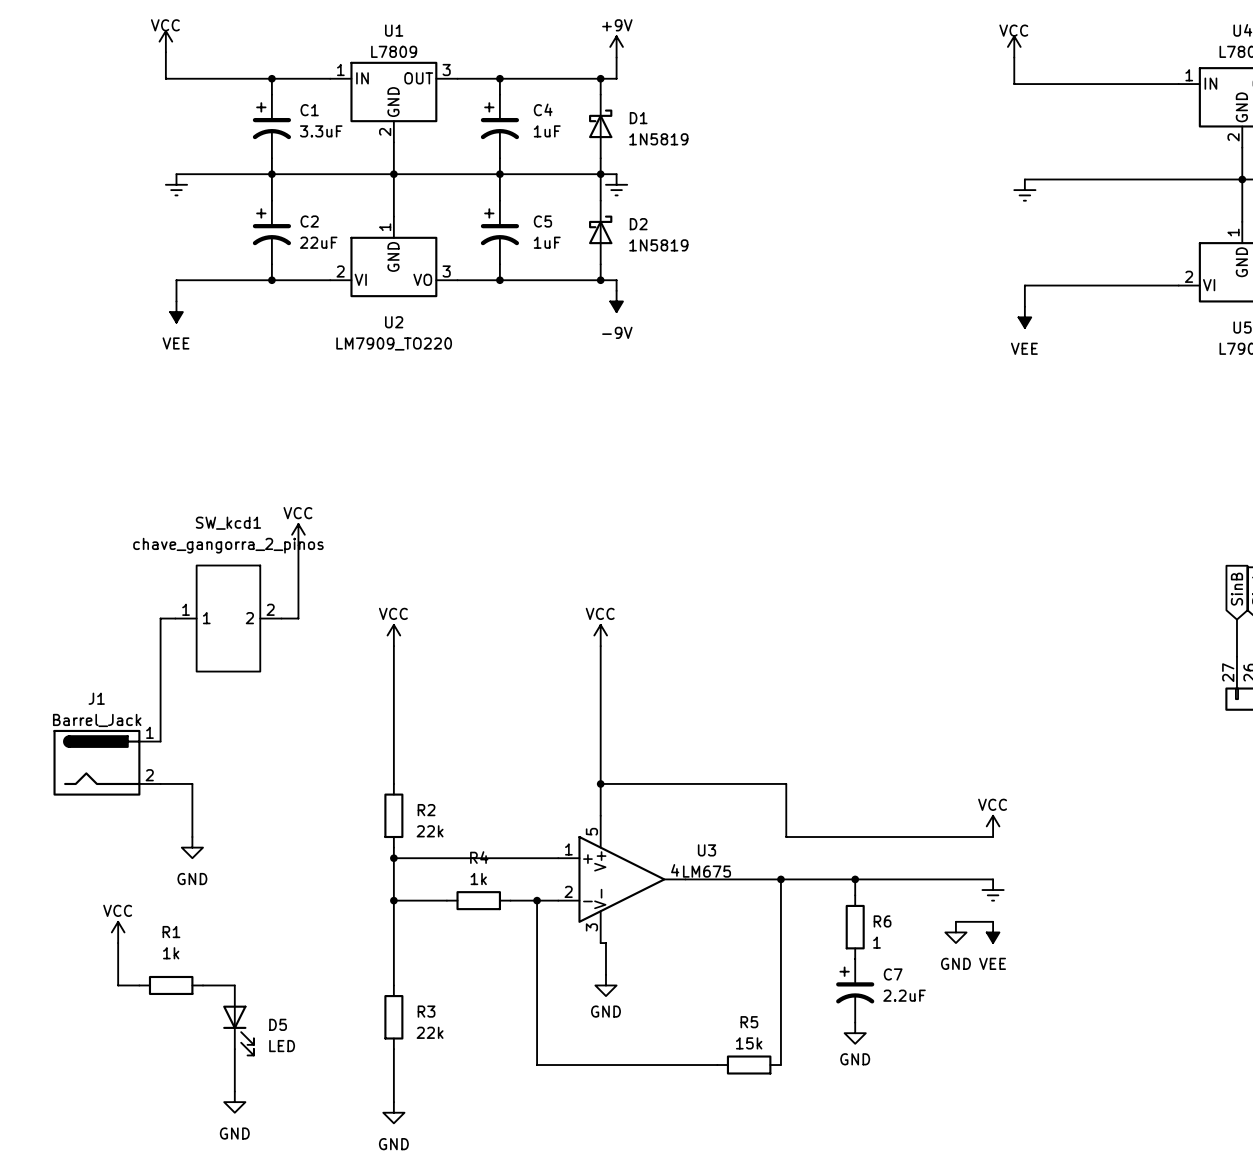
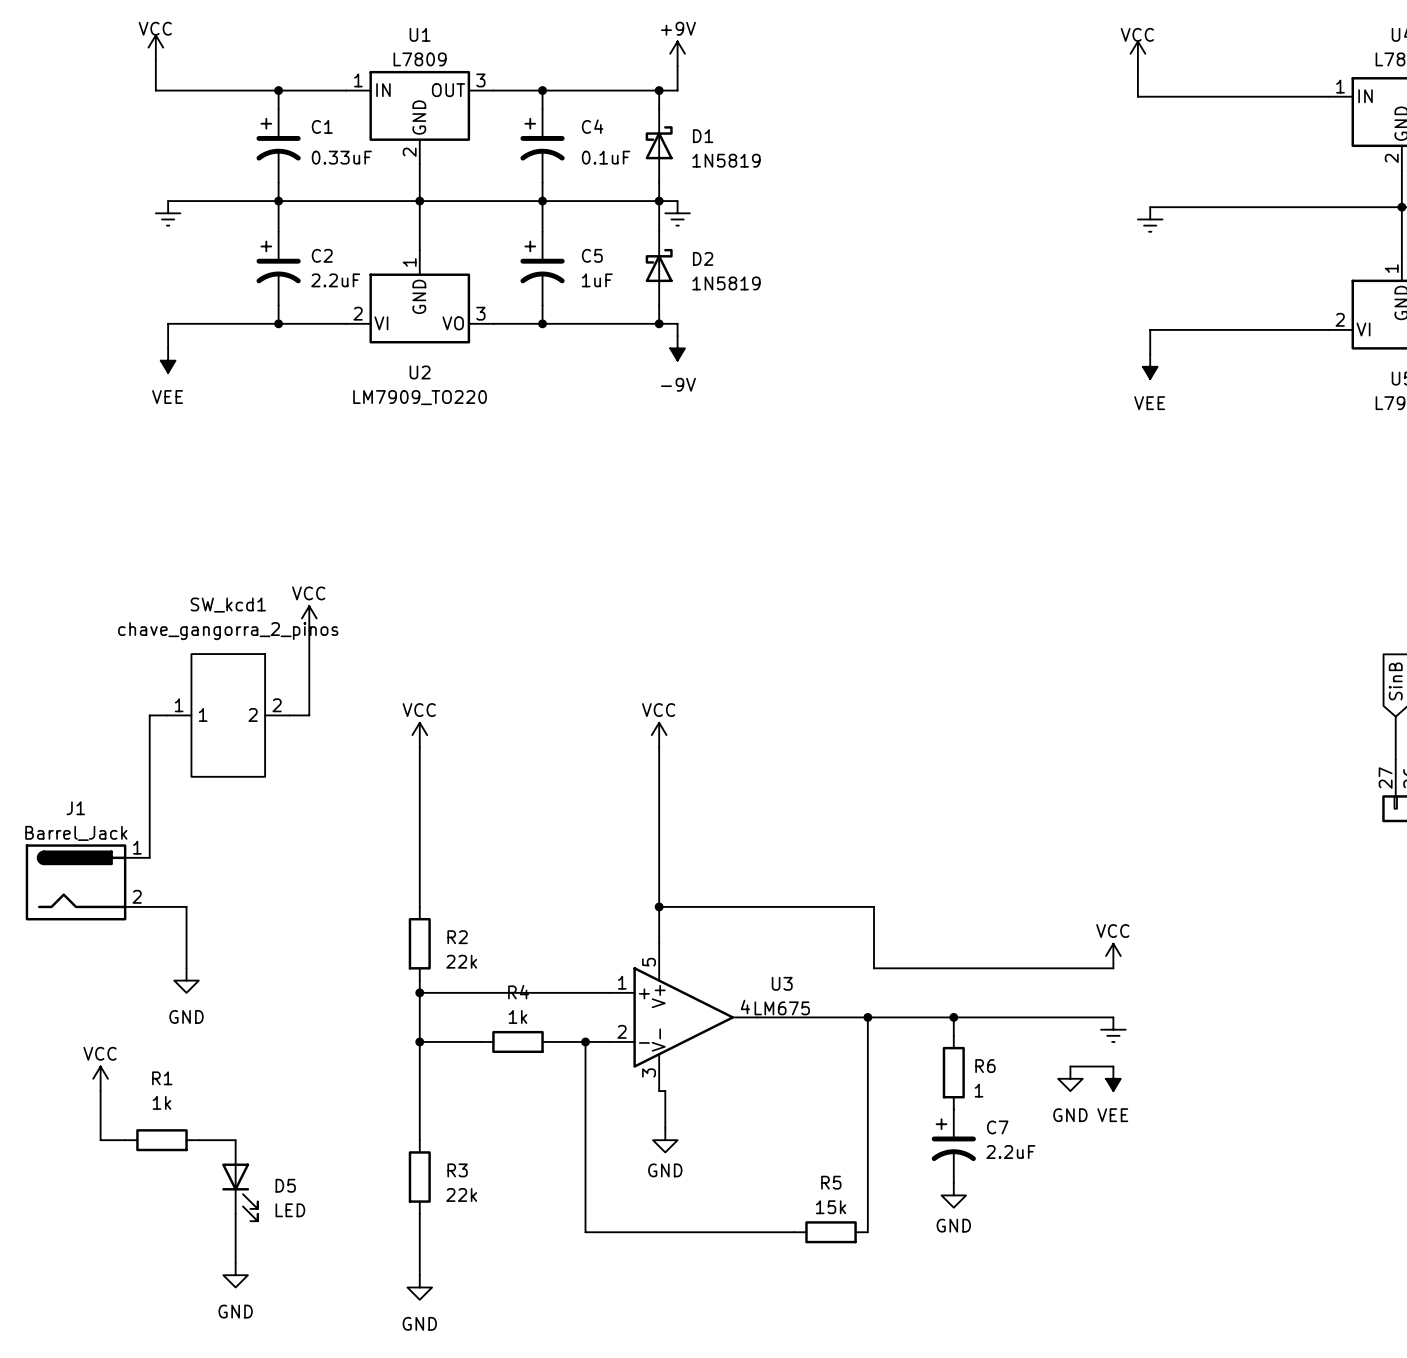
C1 value: 3.3uF (321, 131) -> 0.33uF (341, 157)
C4 value: 1uF (547, 131) -> 0.1uF (606, 157)
C2 value: 22uF (318, 242) -> 2.2uF (335, 280)

